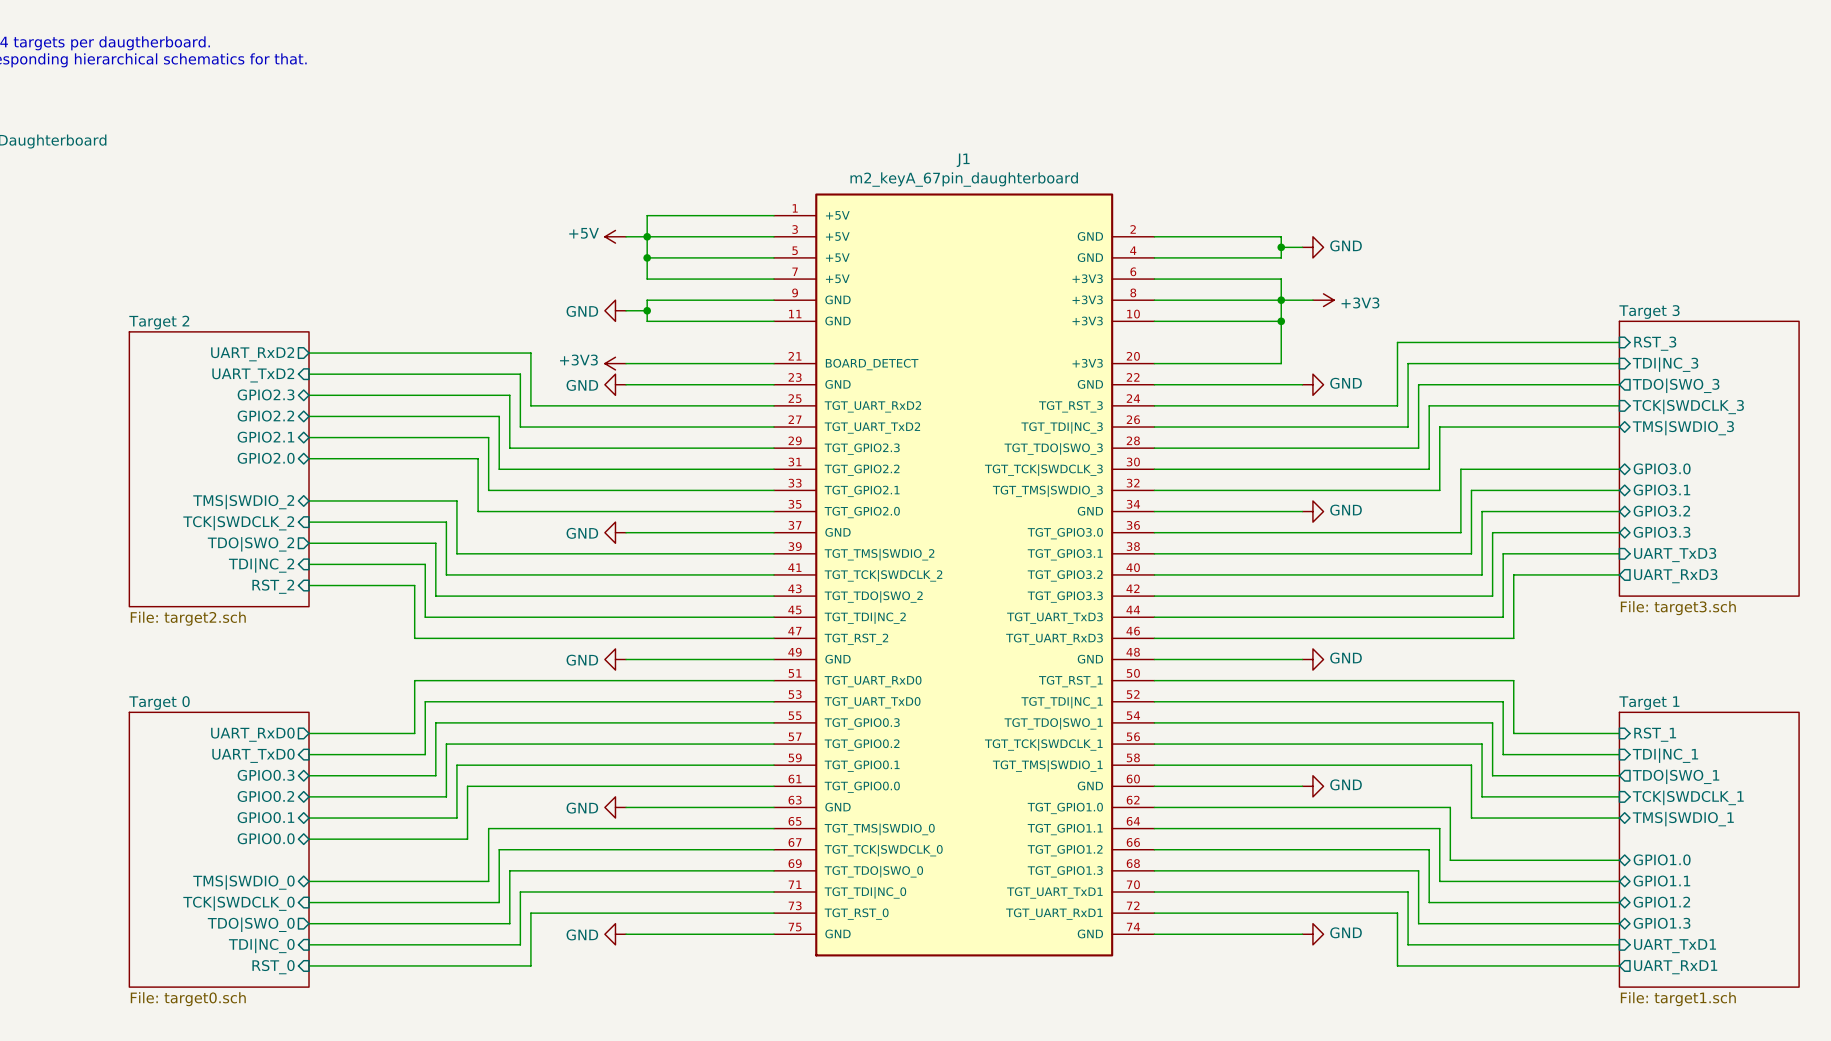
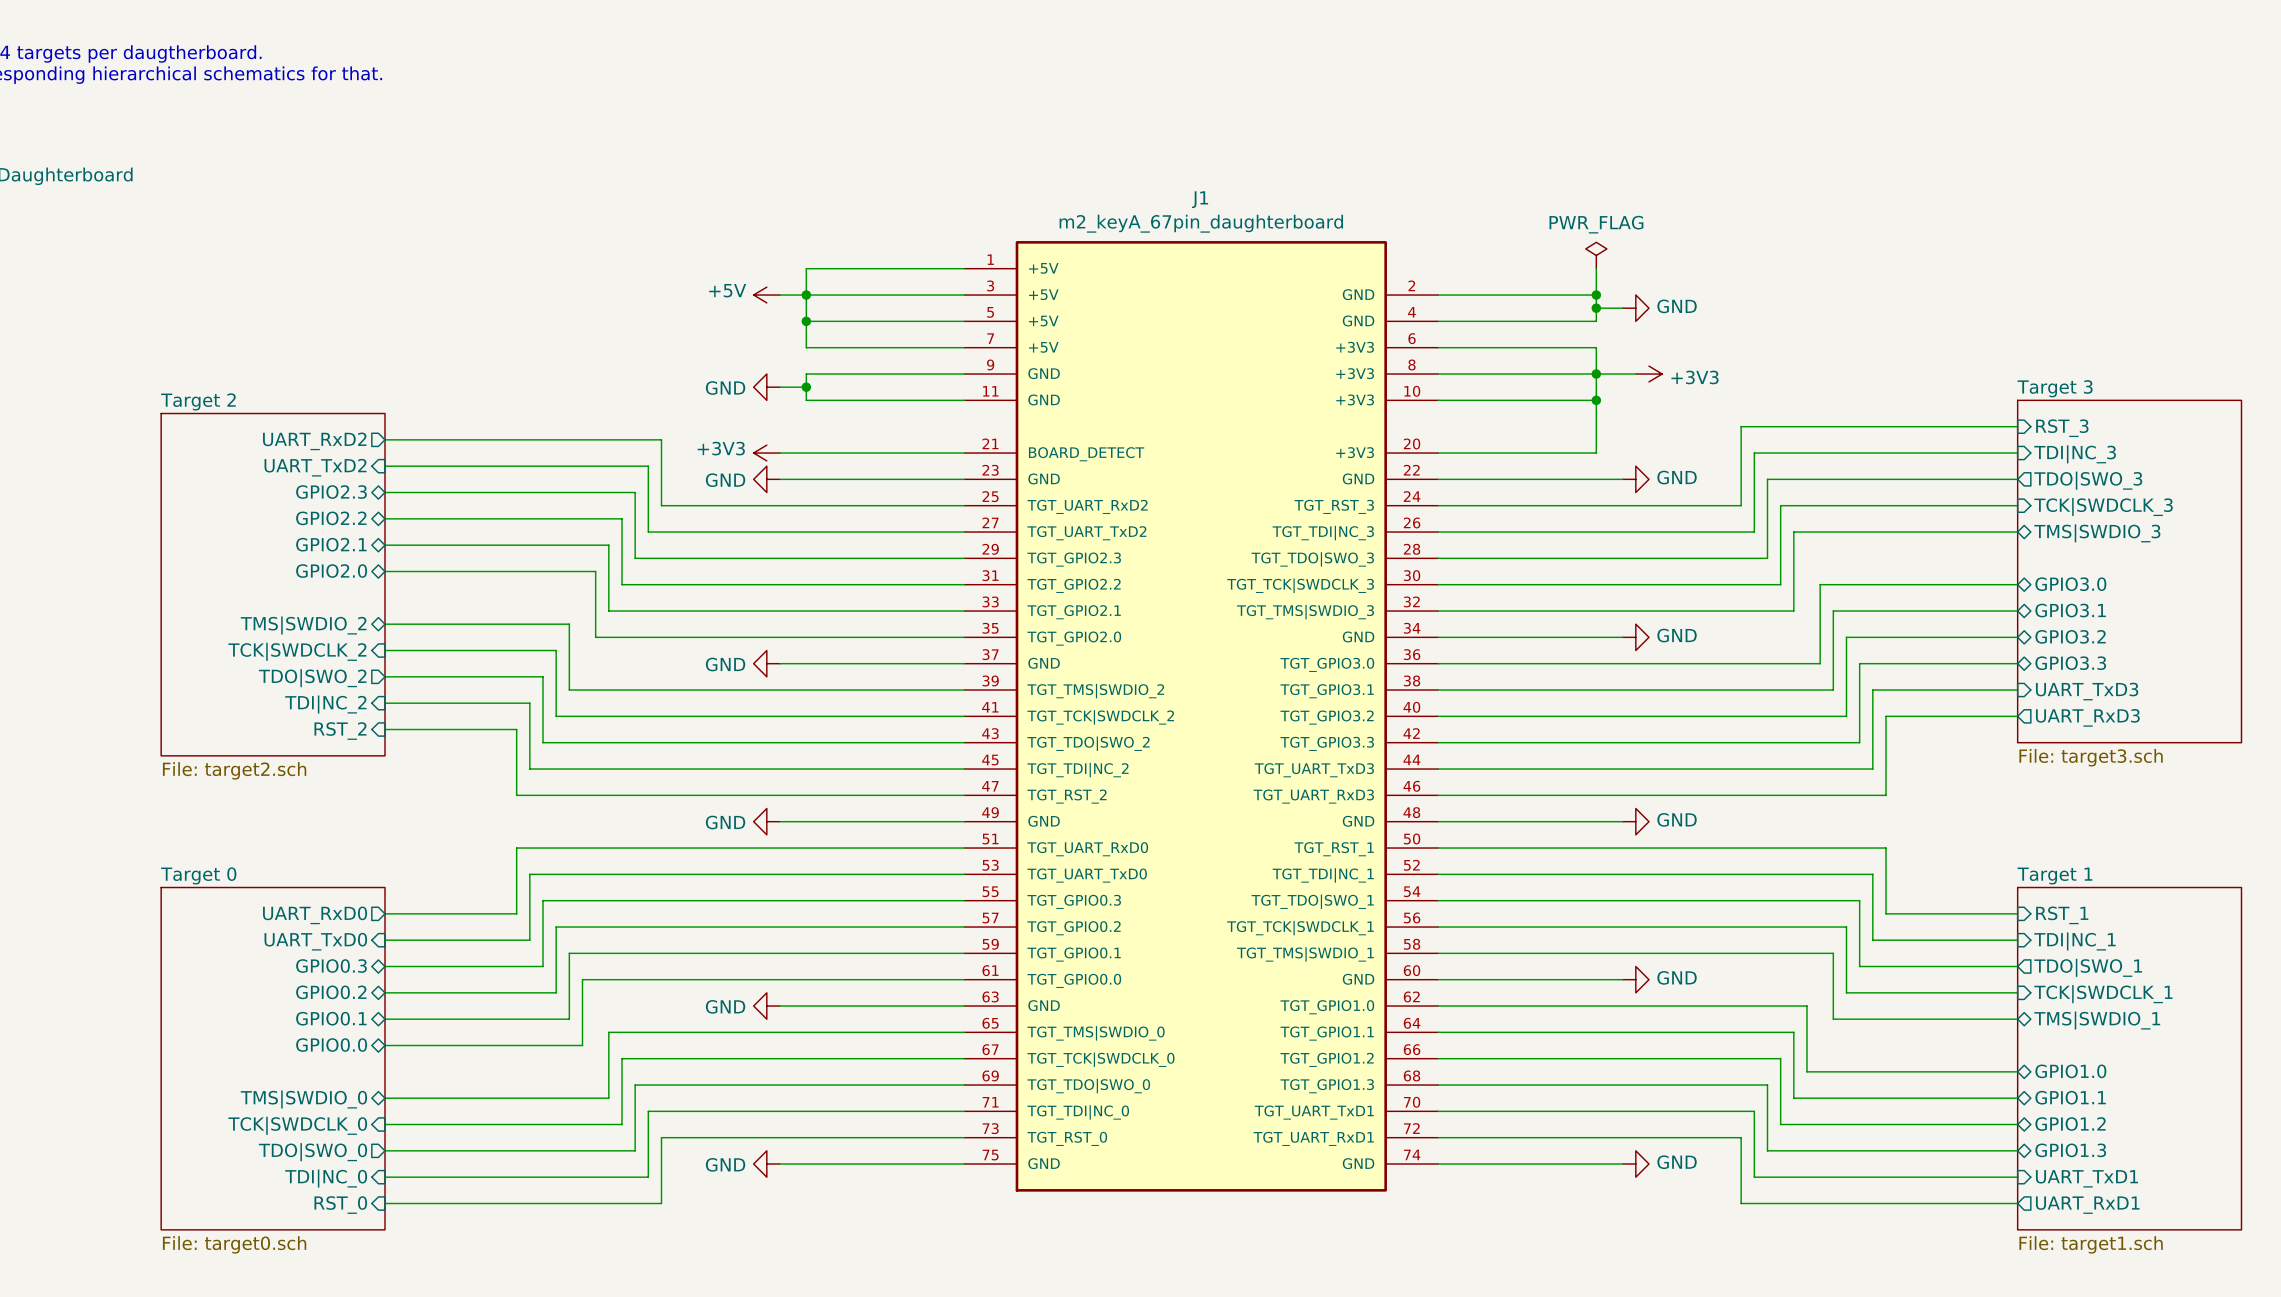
power symbol: none -> PWR_FLAG (1596, 255)
wire: none -> (1596, 268) (1596, 295)
junction: none -> (1596, 295)

